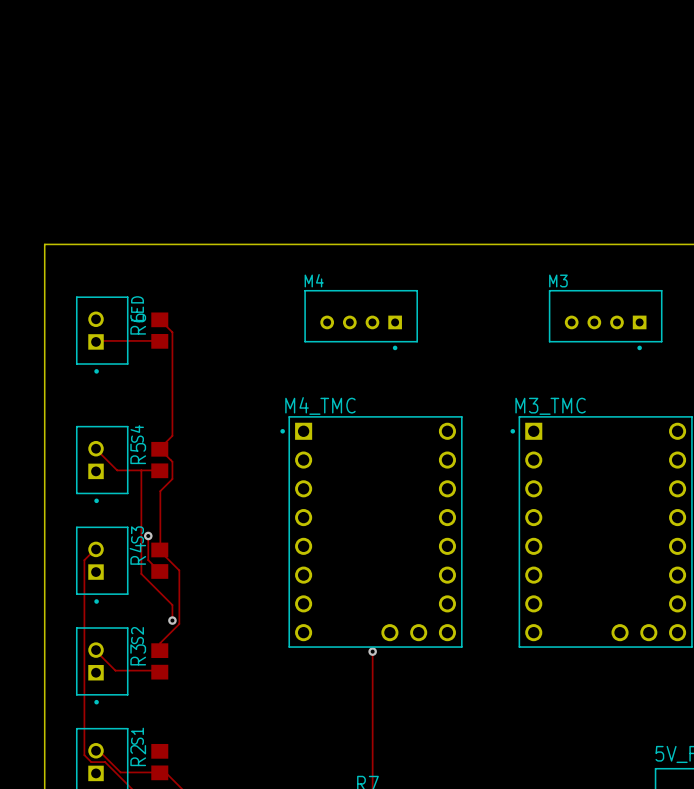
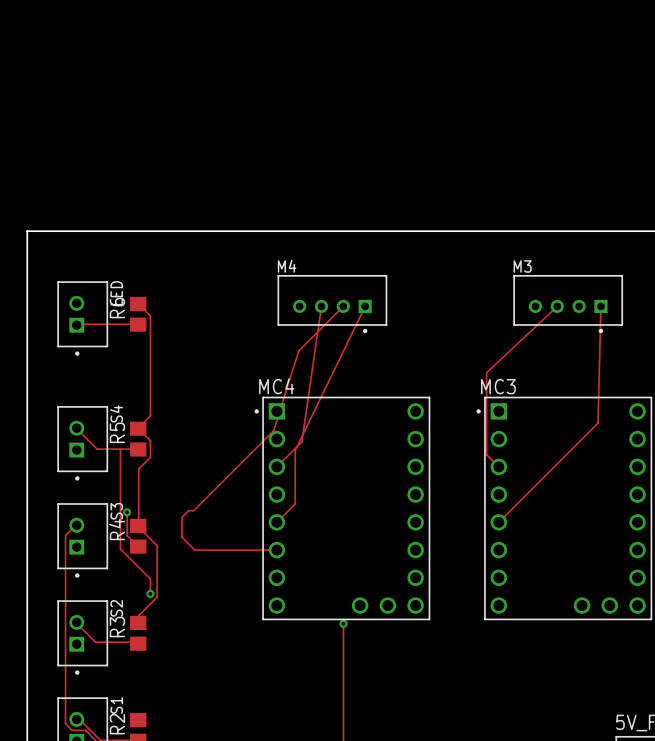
track: none -> (321, 306) (301, 441) (276, 466)
track: none -> (343, 306) (298, 351) (273, 430) (193, 510) (188, 510) (182, 517) (182, 537) (194, 550) (276, 550)
track: none -> (365, 306) (295, 450) (295, 504) (276, 522)
track: none -> (557, 306) (486, 372) (486, 454) (498, 466)
track: none -> (600, 306) (597, 423) (498, 522)
M4_TMC name: M4_TMC (320, 405) -> MC4 (276, 386)
M3_TMC name: M3_TMC (550, 406) -> MC3 (498, 386)

